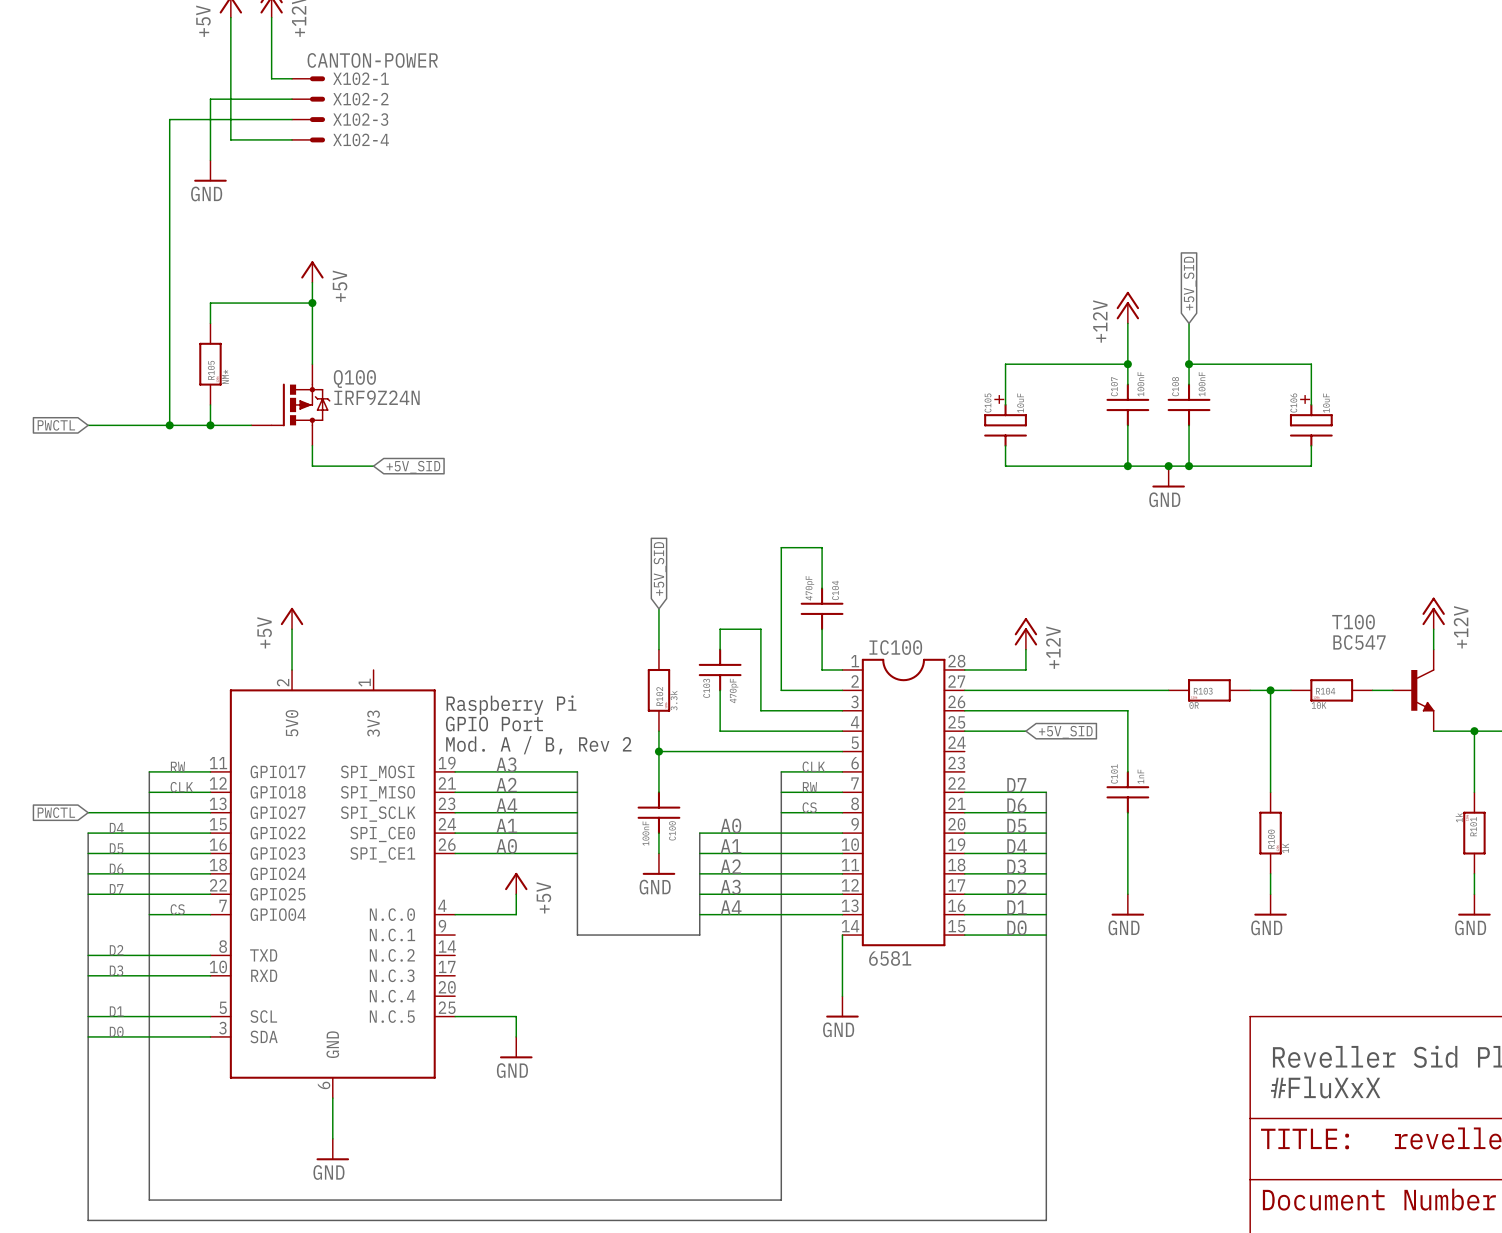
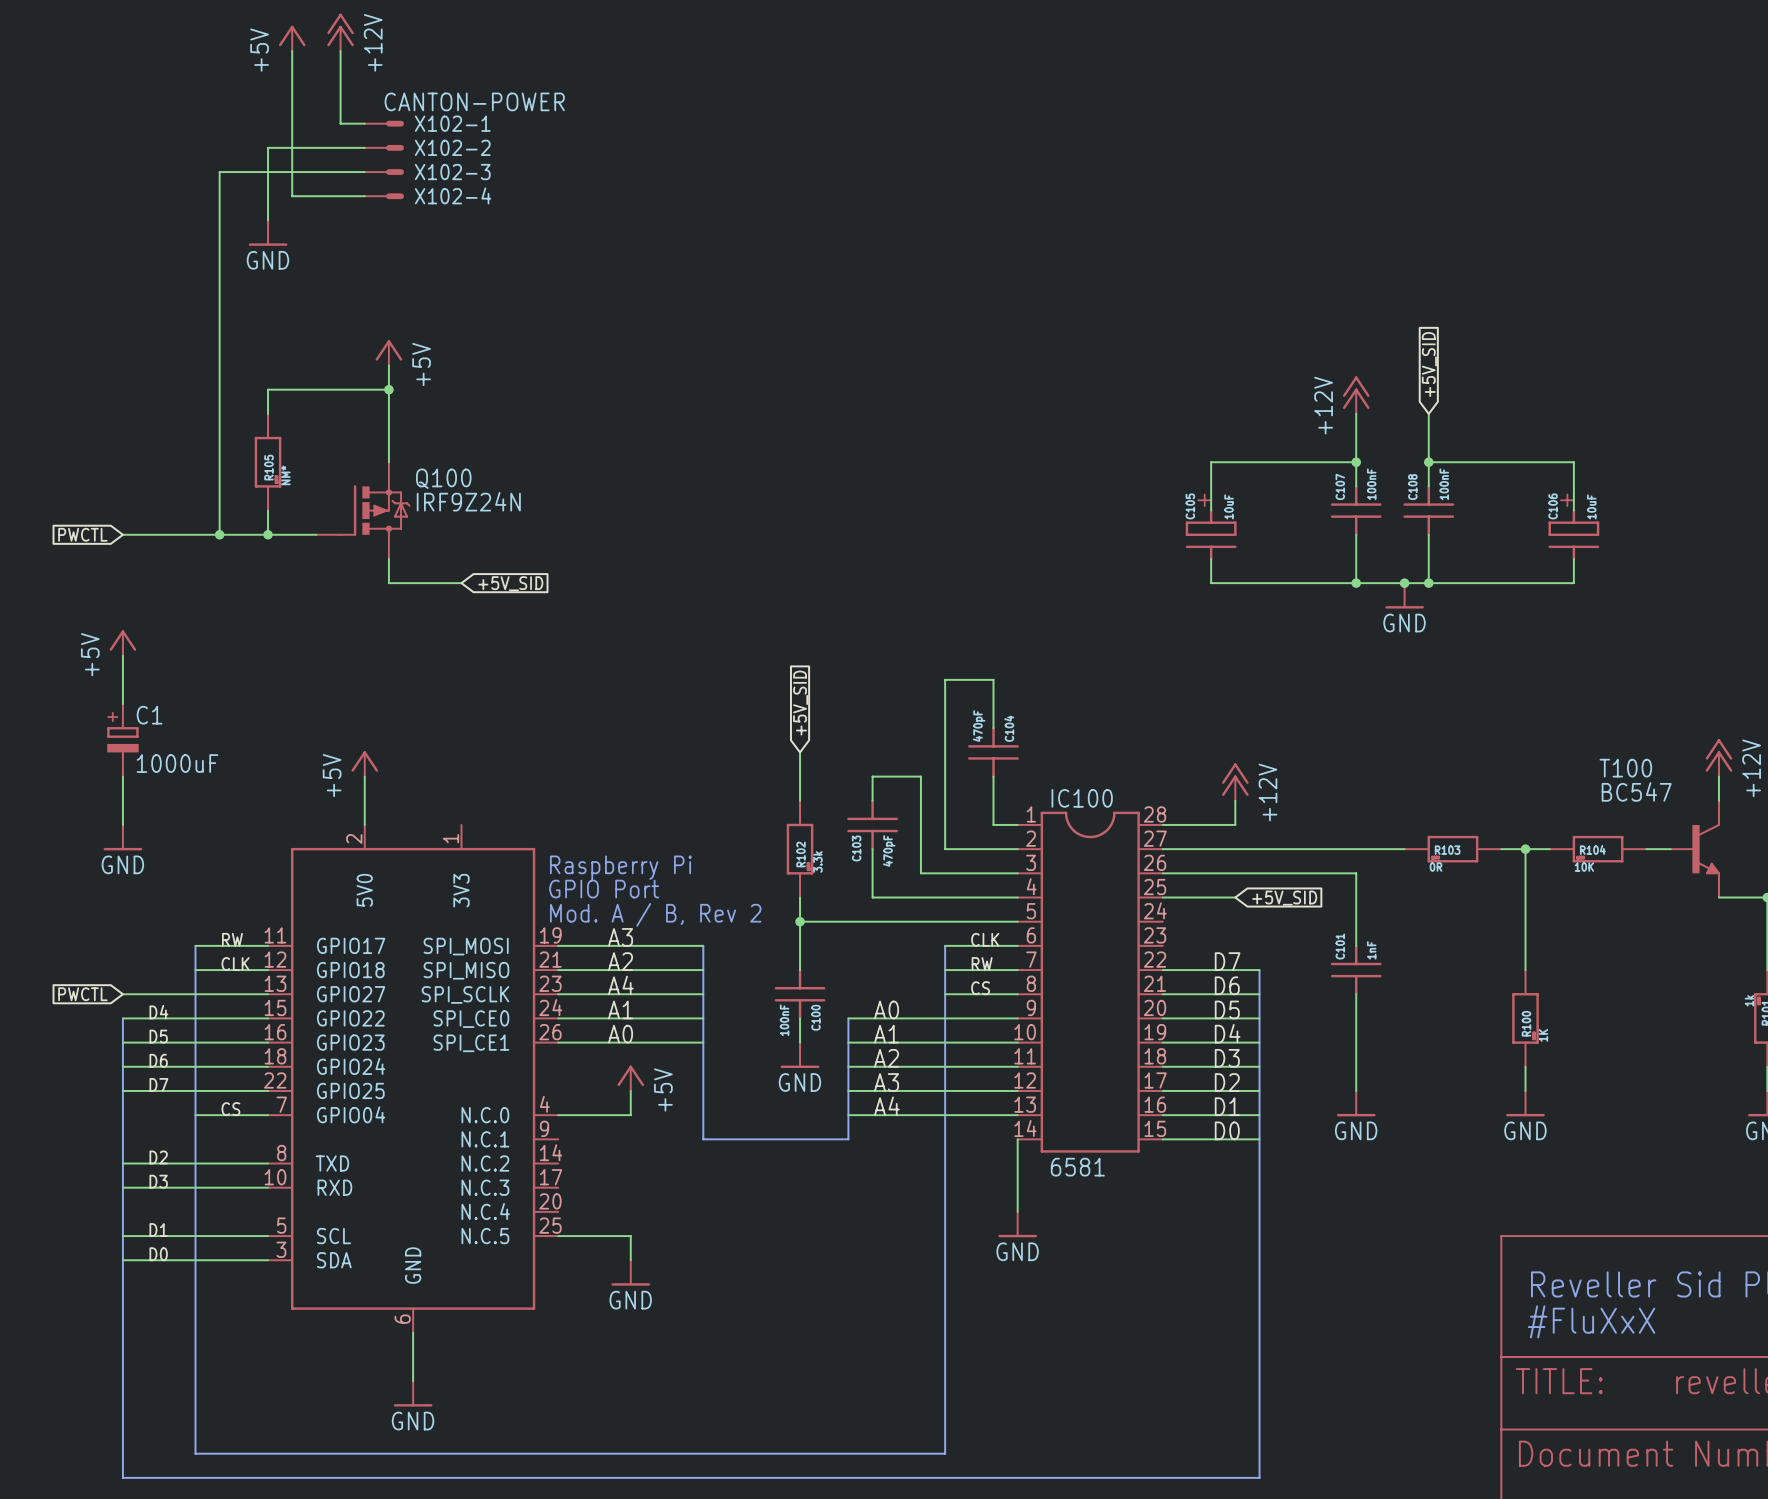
power symbol: none -> +5V (122, 642)
wire: none -> (122, 655) (122, 704)
C1: none -> 1000uF (122, 740)
wire: none -> (122, 776) (122, 824)
power symbol: none -> GND (122, 837)

